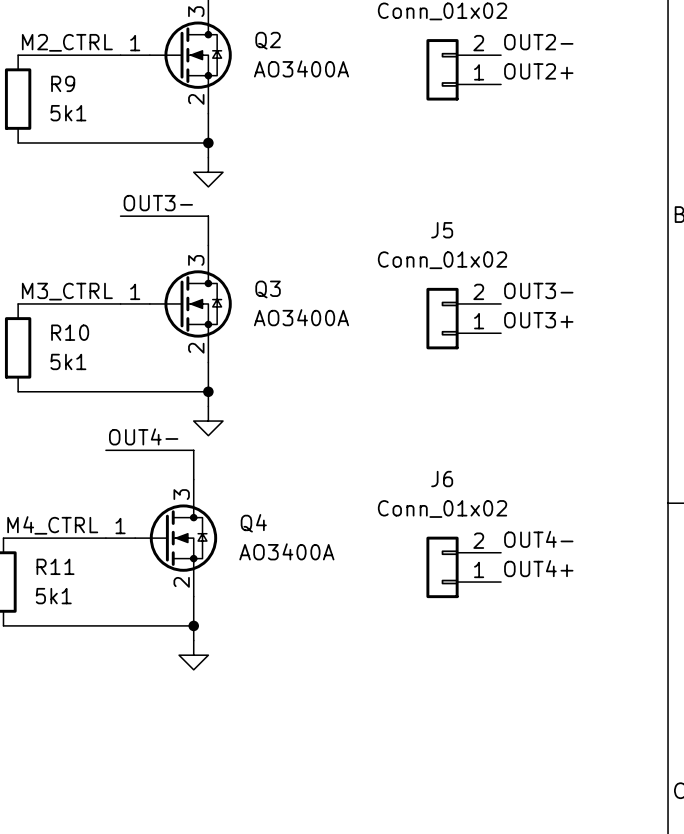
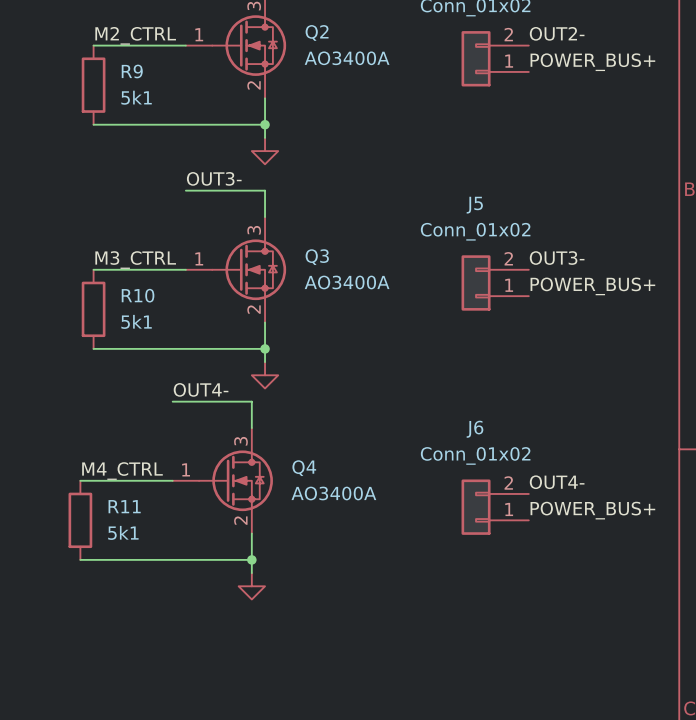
label: OUT2+ (538, 71) -> POWER_BUS+ (592, 62)
label: OUT3+ (538, 320) -> POWER_BUS+ (592, 286)
label: OUT4+ (538, 568) -> POWER_BUS+ (592, 510)

